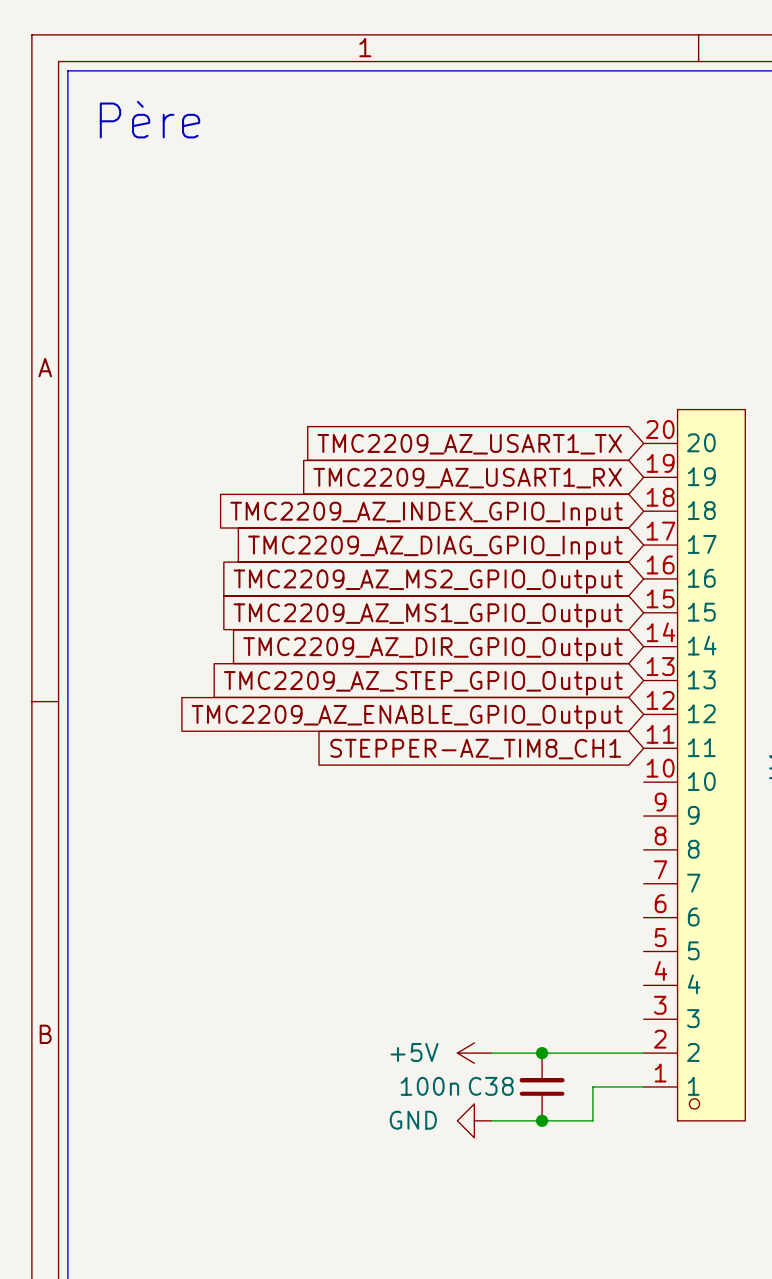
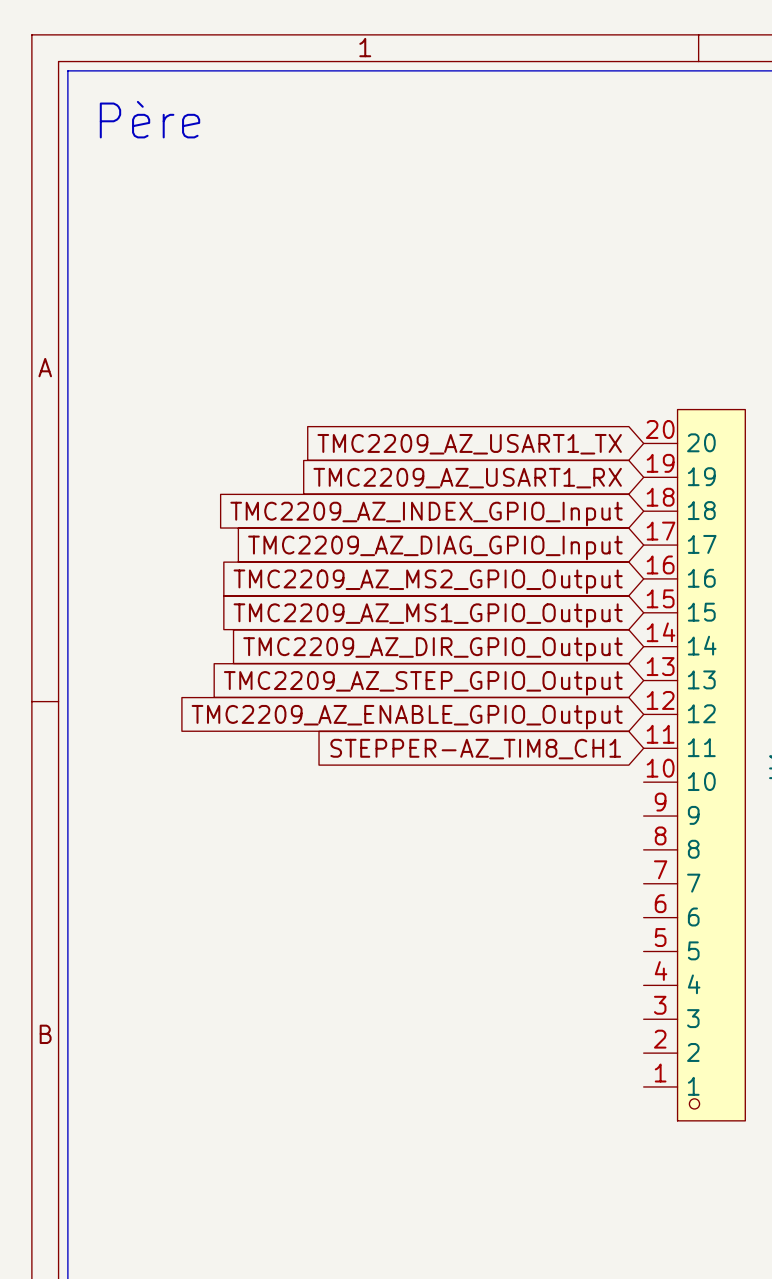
power symbol: +5V (474, 1053) -> none
wire: (491, 1053) (643, 1053) -> none
junction: (542, 1053) -> none
C38: 100n (542, 1086) -> none
wire: (643, 1086) (592, 1086) (592, 1120) (491, 1120) -> none
power symbol: GND (474, 1120) -> none
junction: (542, 1120) -> none

